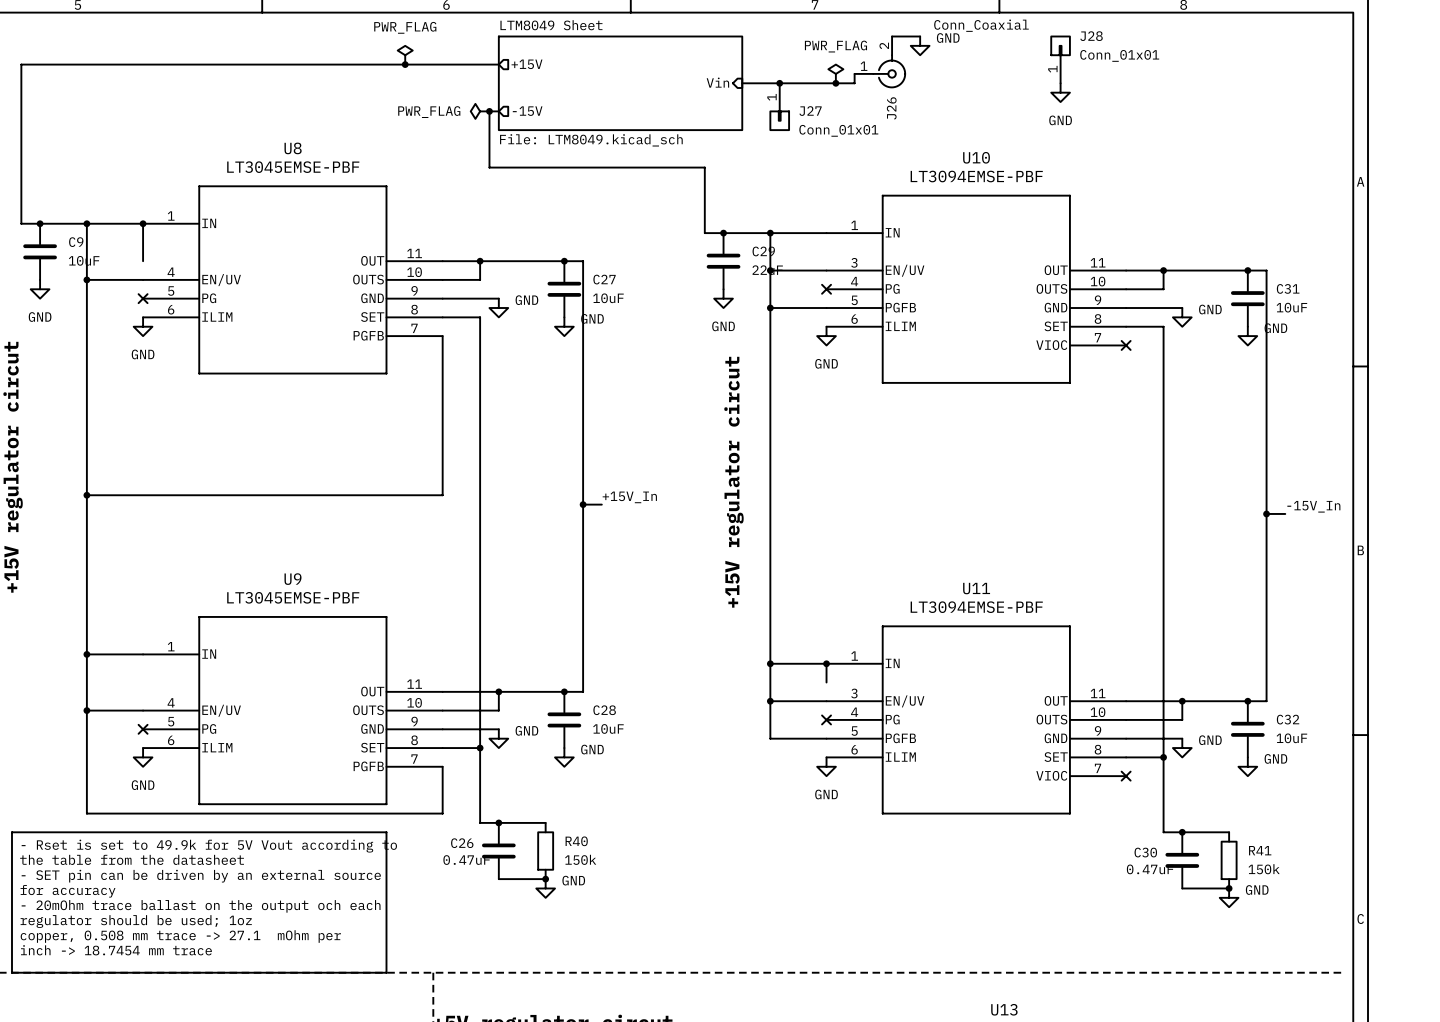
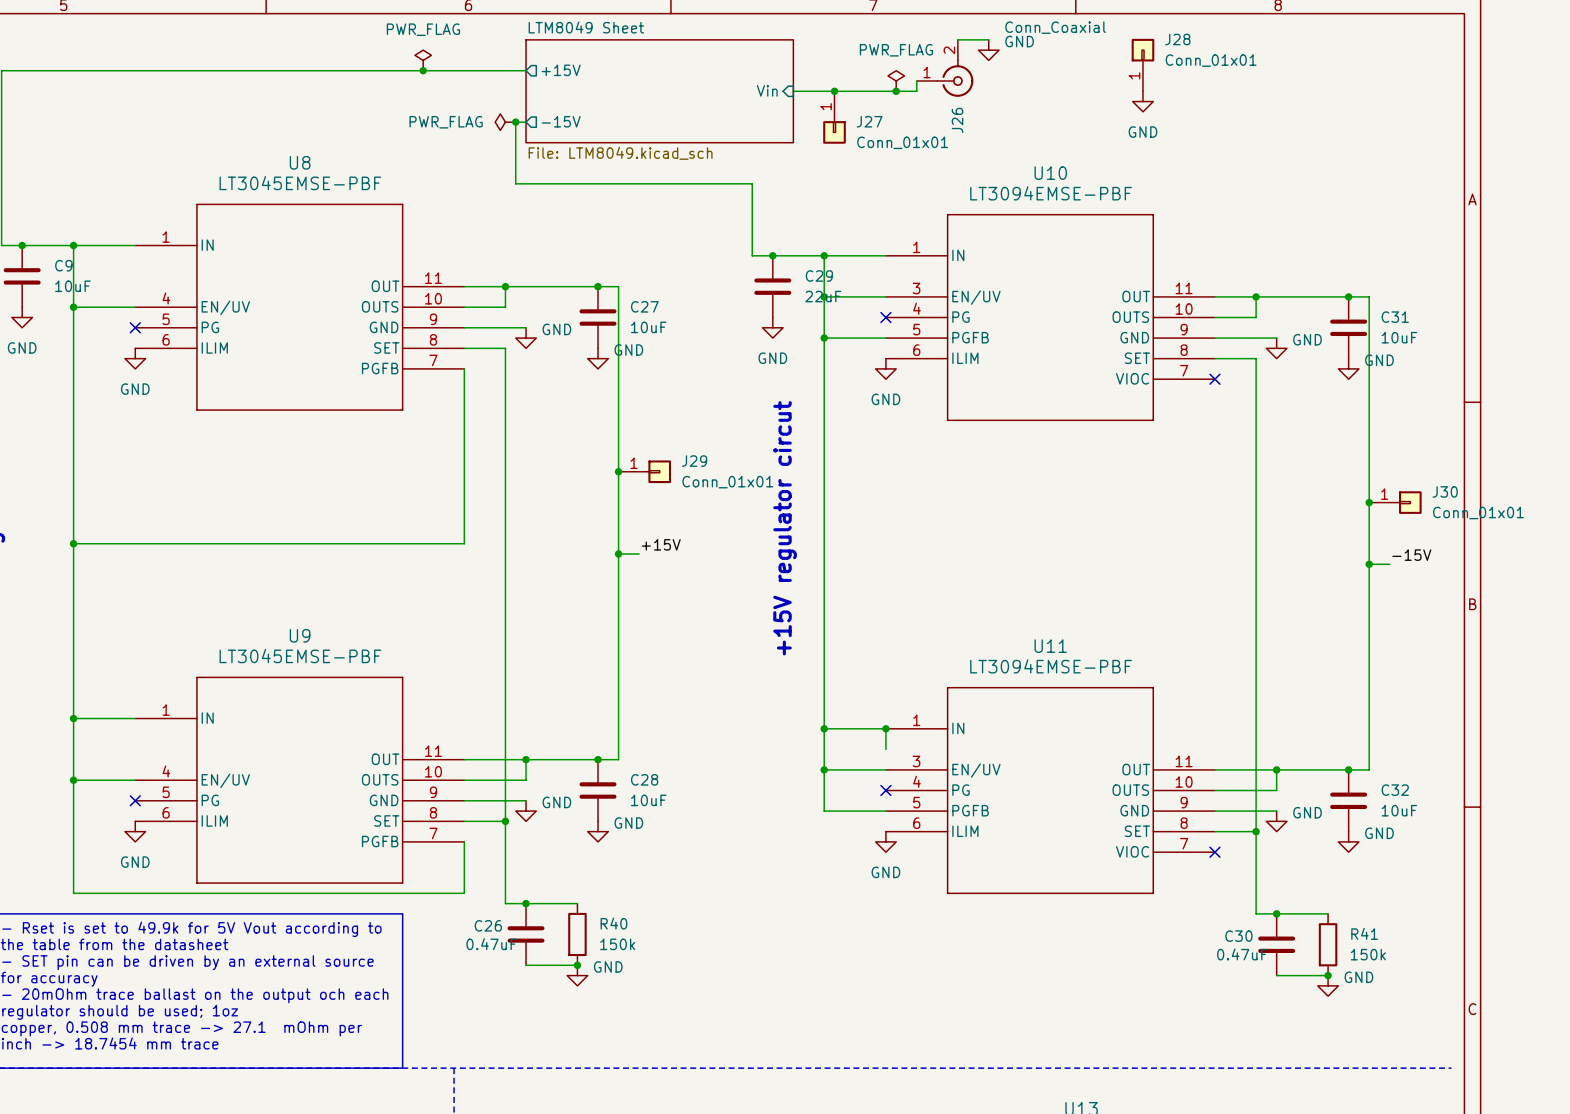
wire: (143, 223) (143, 261) -> none
junction: (143, 223) -> none
junction: none -> (618, 471)
J29: none -> Conn_01x01 (644, 471)
junction: none -> (1369, 502)
J30: none -> Conn_01x01 (1395, 502)
label: +15V_In (629, 497) -> +15V (661, 544)
label: -15V_In (1313, 506) -> -15V (1411, 555)

